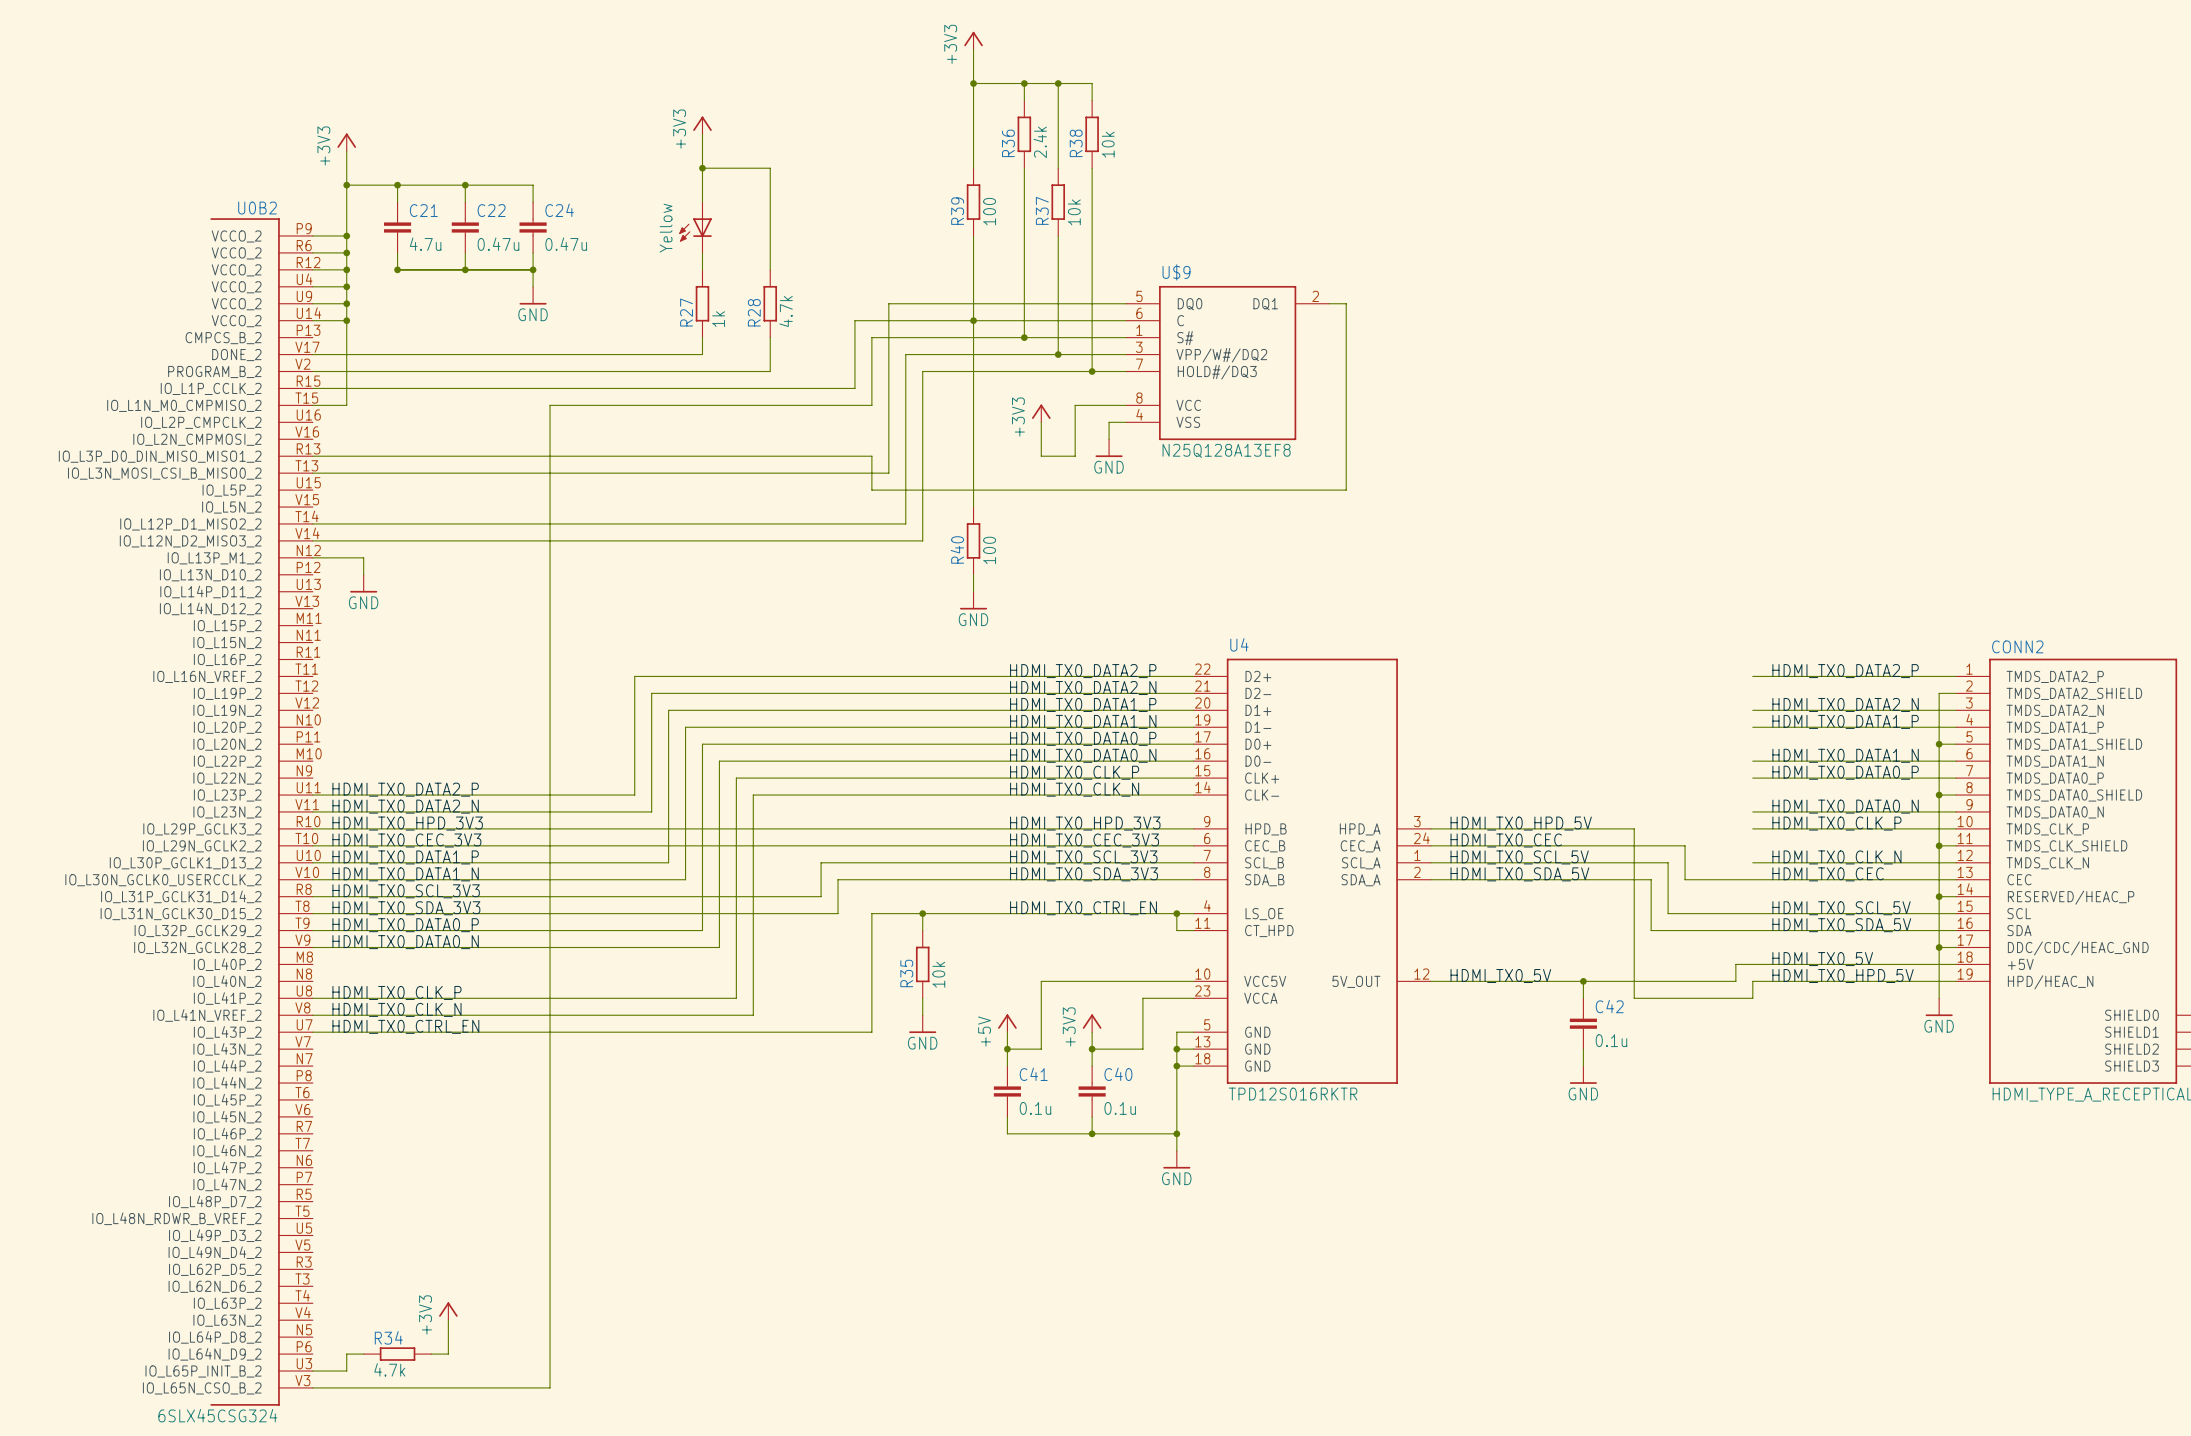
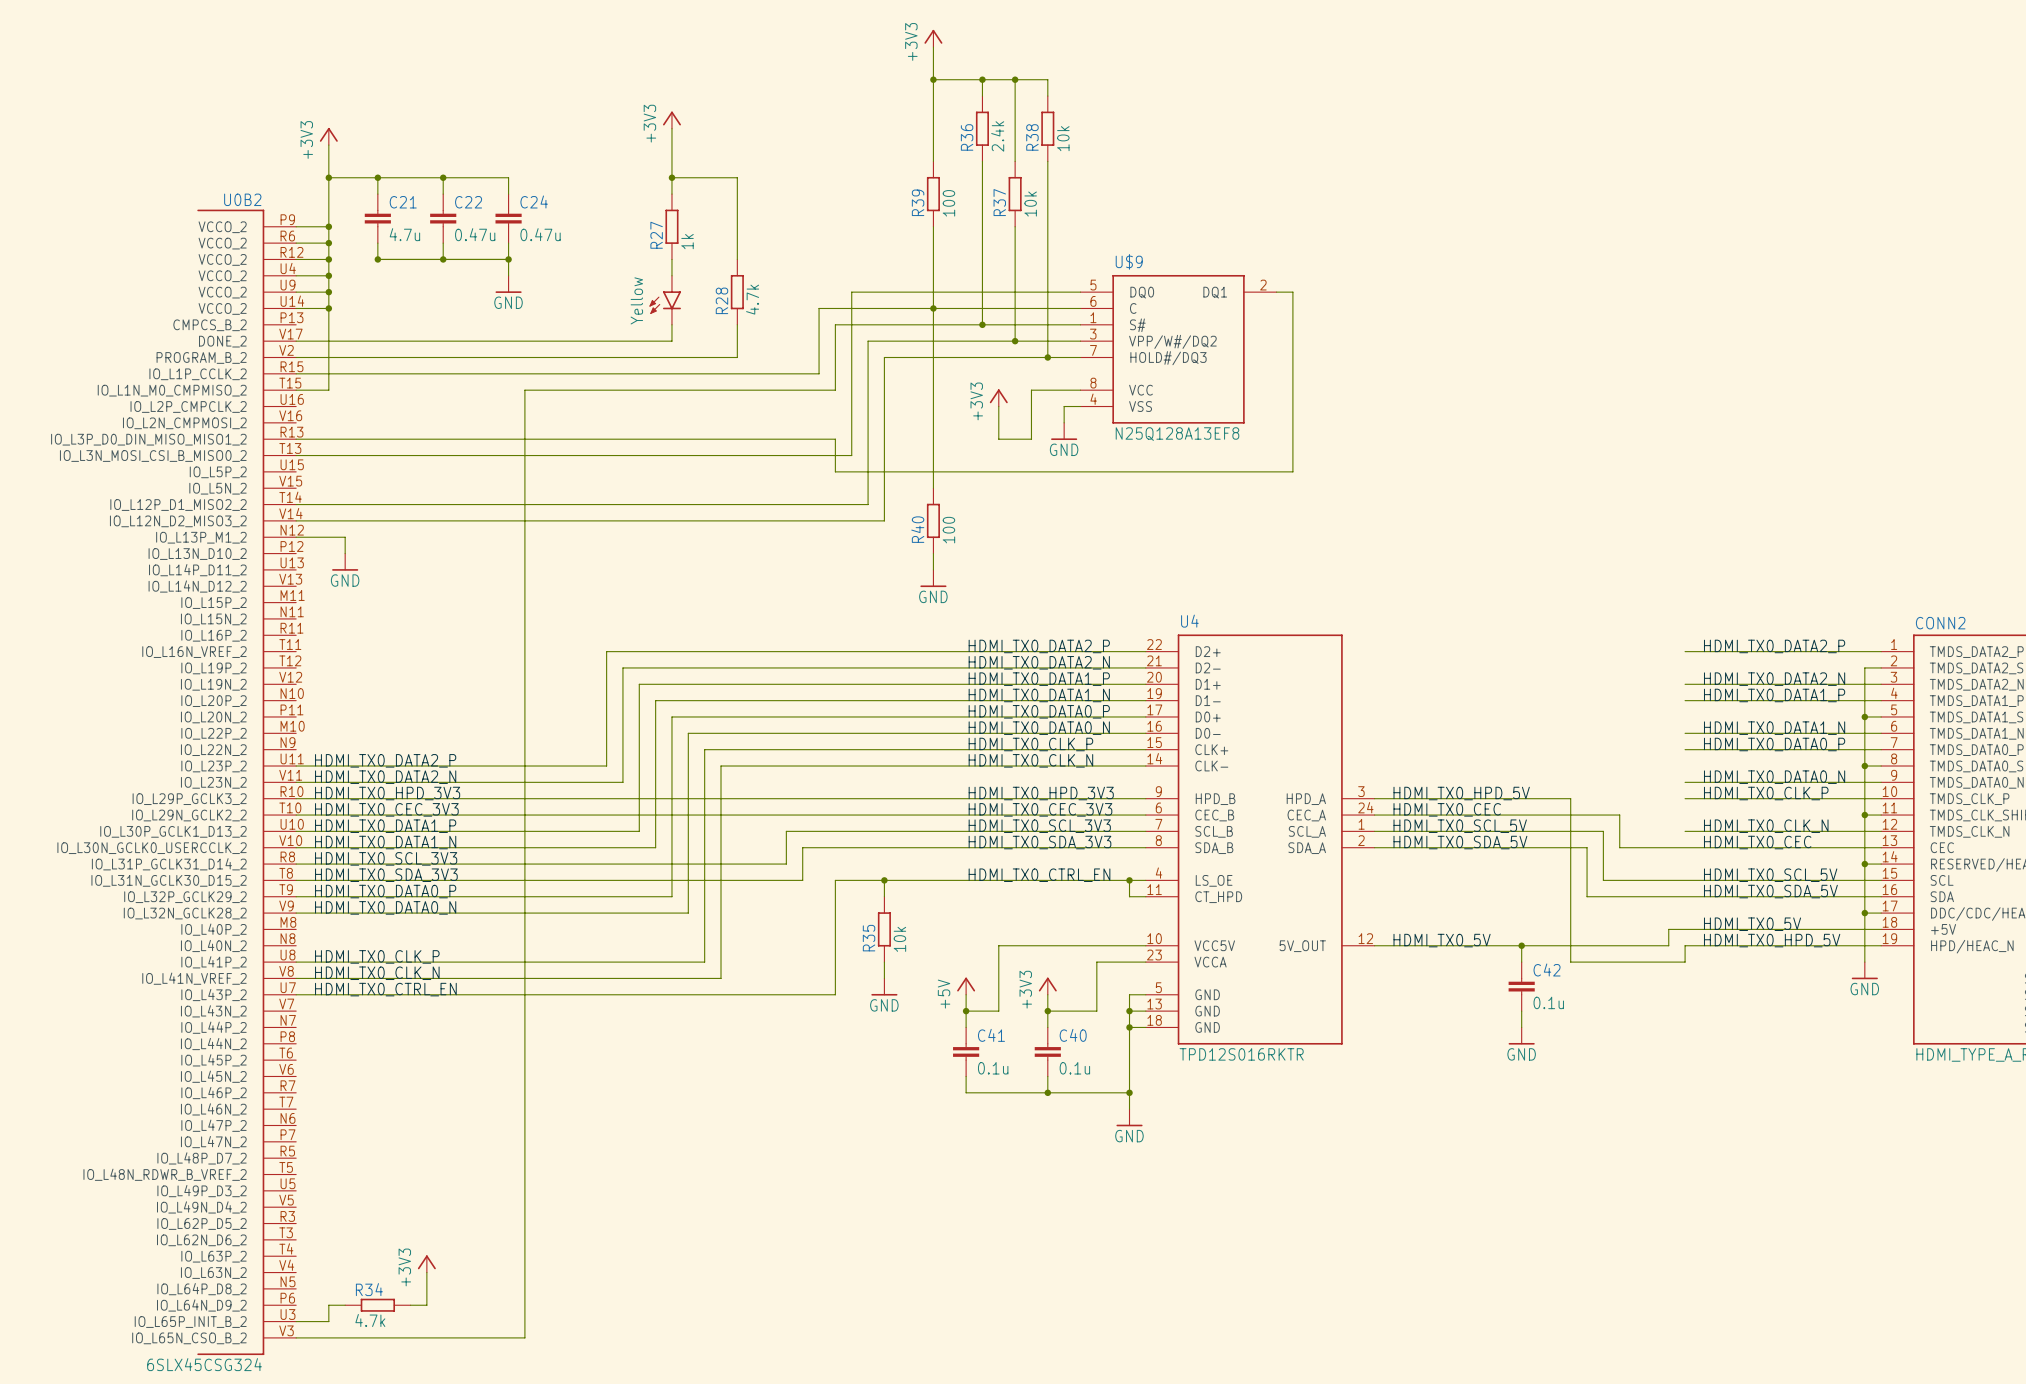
wire: (702, 168) (770, 168) (770, 185) -> (671, 177) (737, 177)
junction position: (702, 168) -> (671, 177)
part: Yellow (695, 227) -> none
R27 position: (702, 303) -> (671, 226)
part: none -> Yellow (665, 300)

